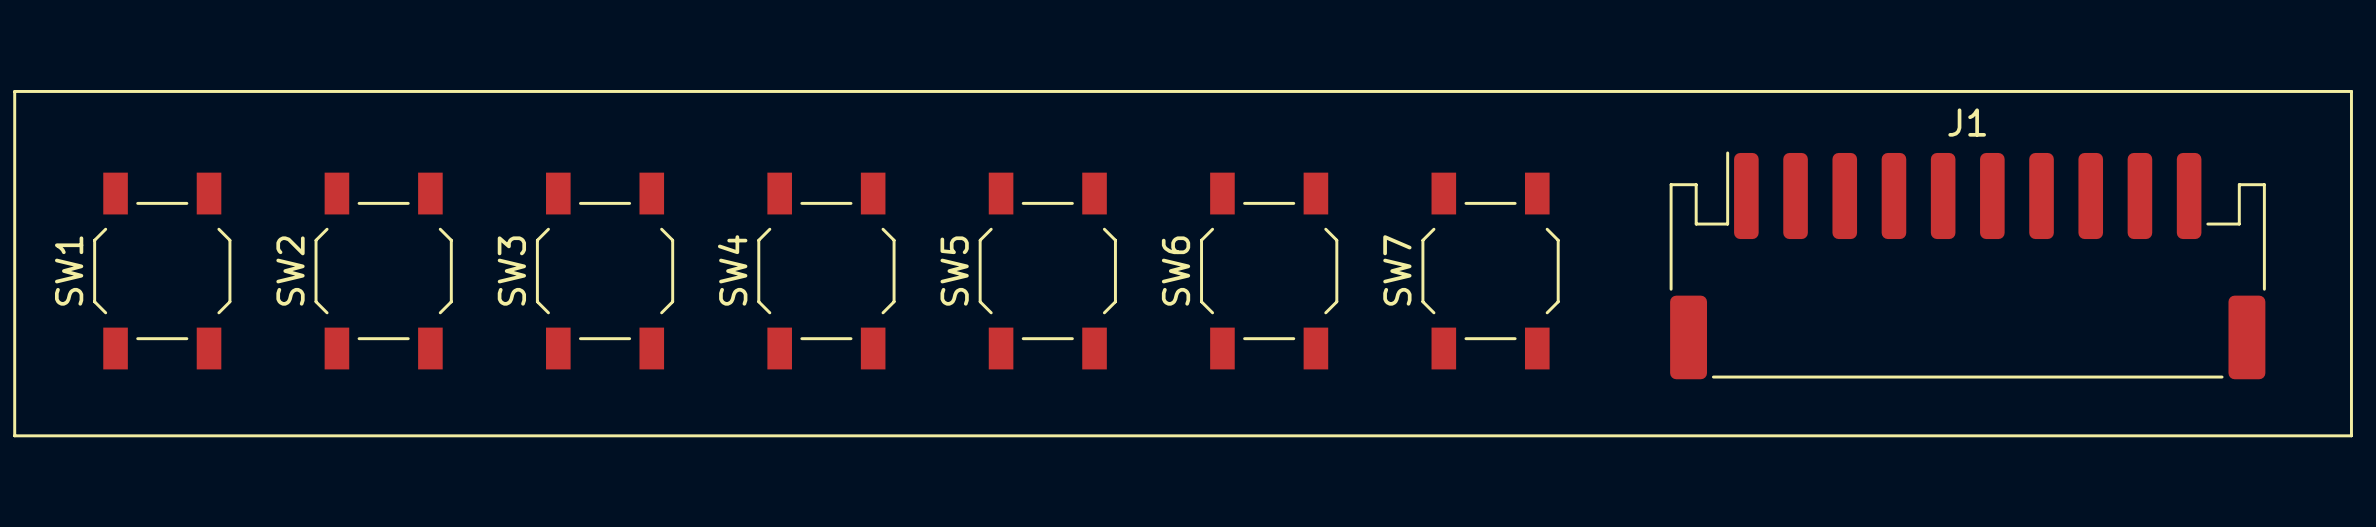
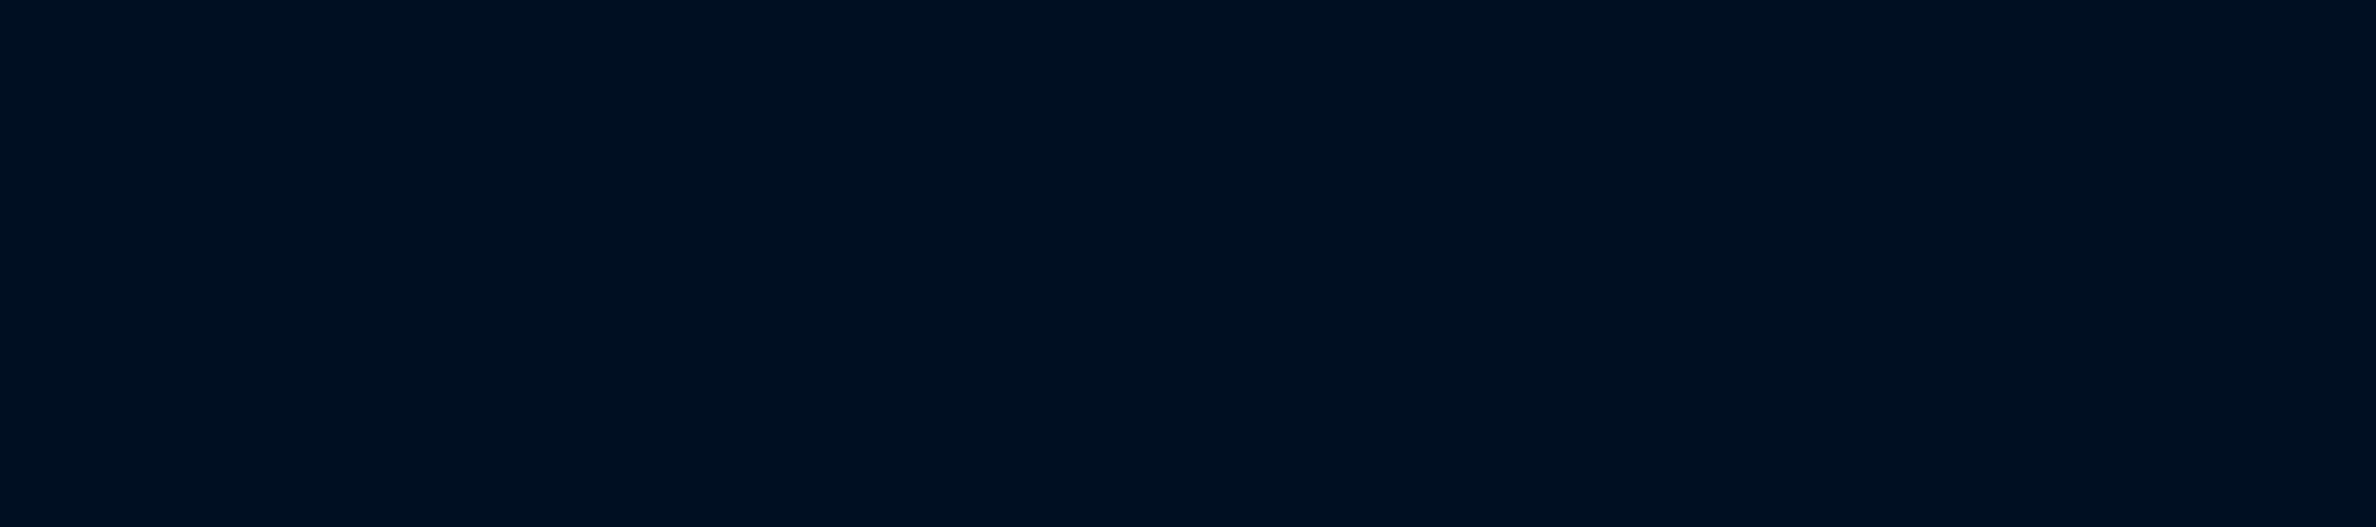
line: (14, 91) (2351, 91) (2351, 435) (14, 435) (14, 91) -> none
J1: (1967, 265) -> none
SW1: (162, 271) -> none
SW2: (383, 271) -> none
SW3: (605, 271) -> none
SW4: (826, 271) -> none
SW5: (1047, 271) -> none
SW6: (1269, 271) -> none
SW7: (1490, 271) -> none

